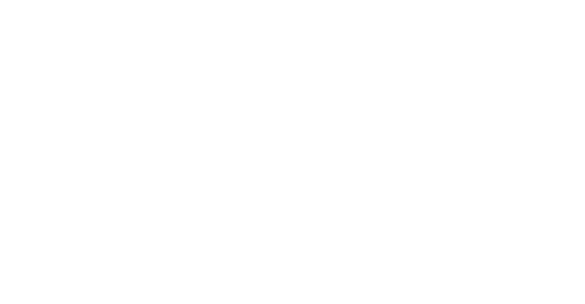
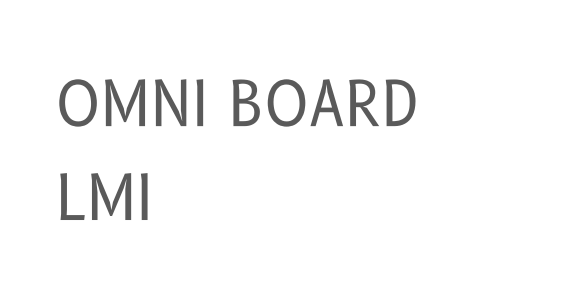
text: none -> OMNI BOARD (237, 102)
text: none -> LMI (103, 196)

